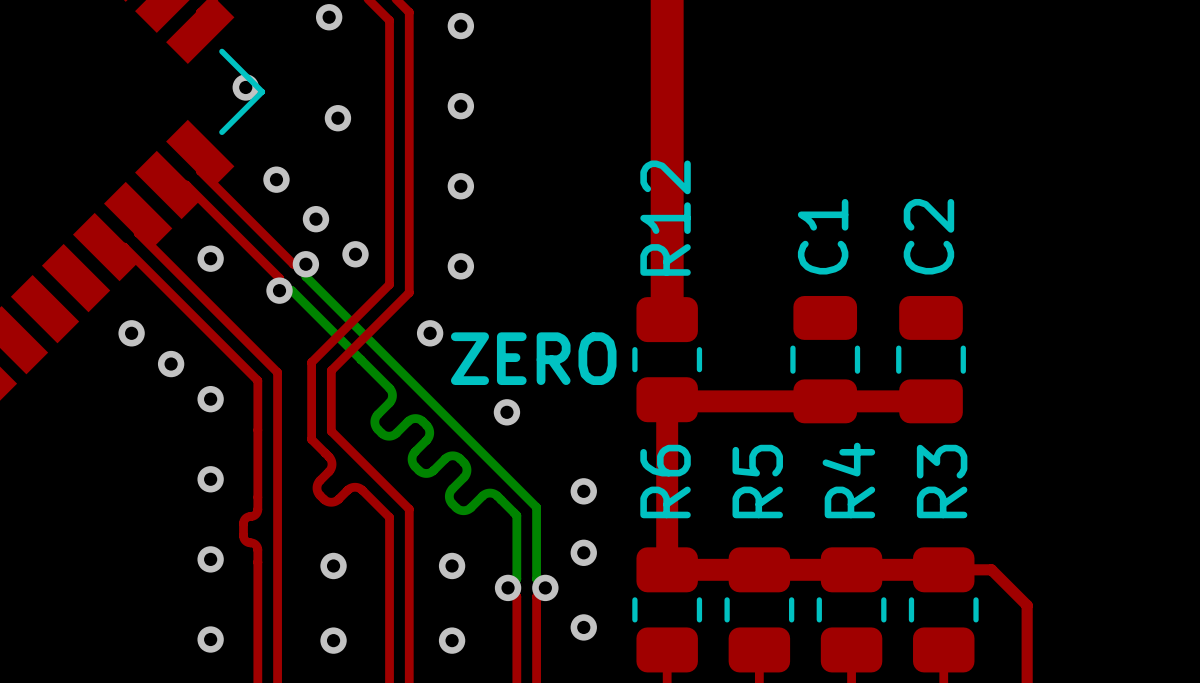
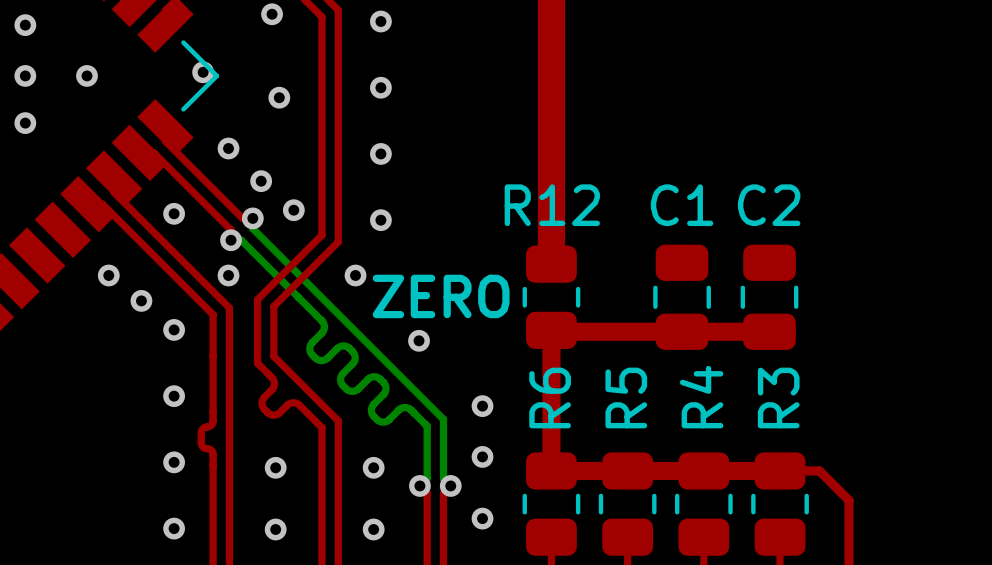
via: none -> (25, 25)
via: none -> (25, 75)
via: none -> (87, 75)
via: none -> (25, 123)
R12 name rotation: 0° (665, 218) -> 90° clockwise (552, 205)
C1 name rotation: 0° (823, 236) -> 90° clockwise (682, 205)
C2 name rotation: 0° (928, 236) -> 90° clockwise (769, 205)
via: none -> (228, 275)

